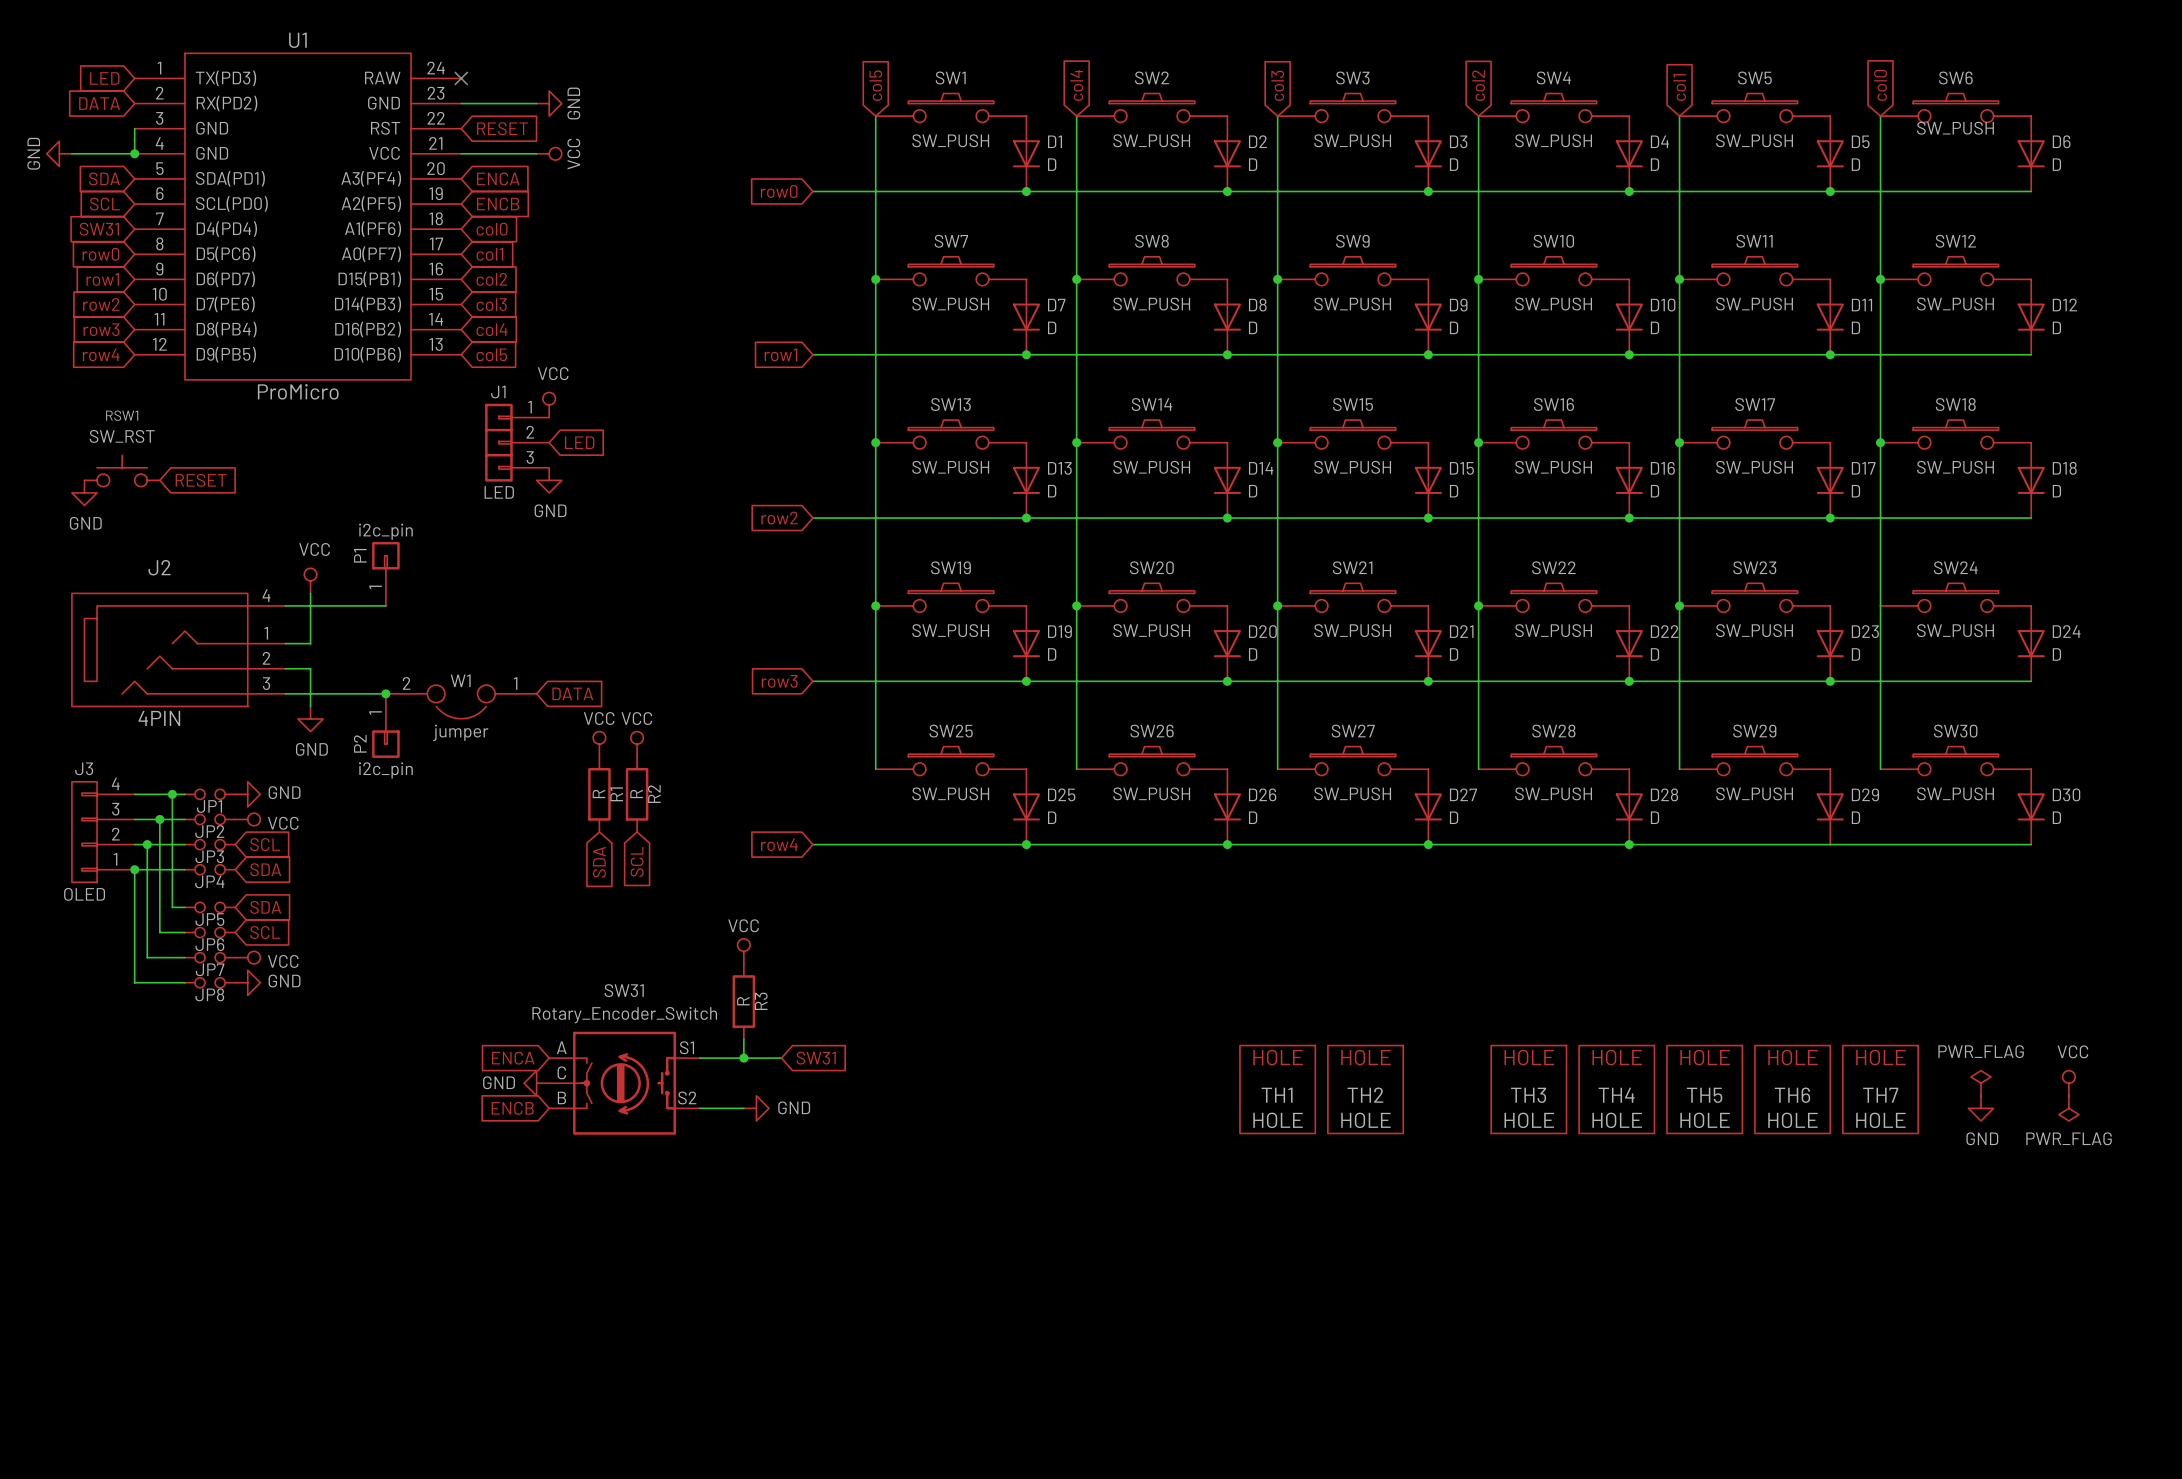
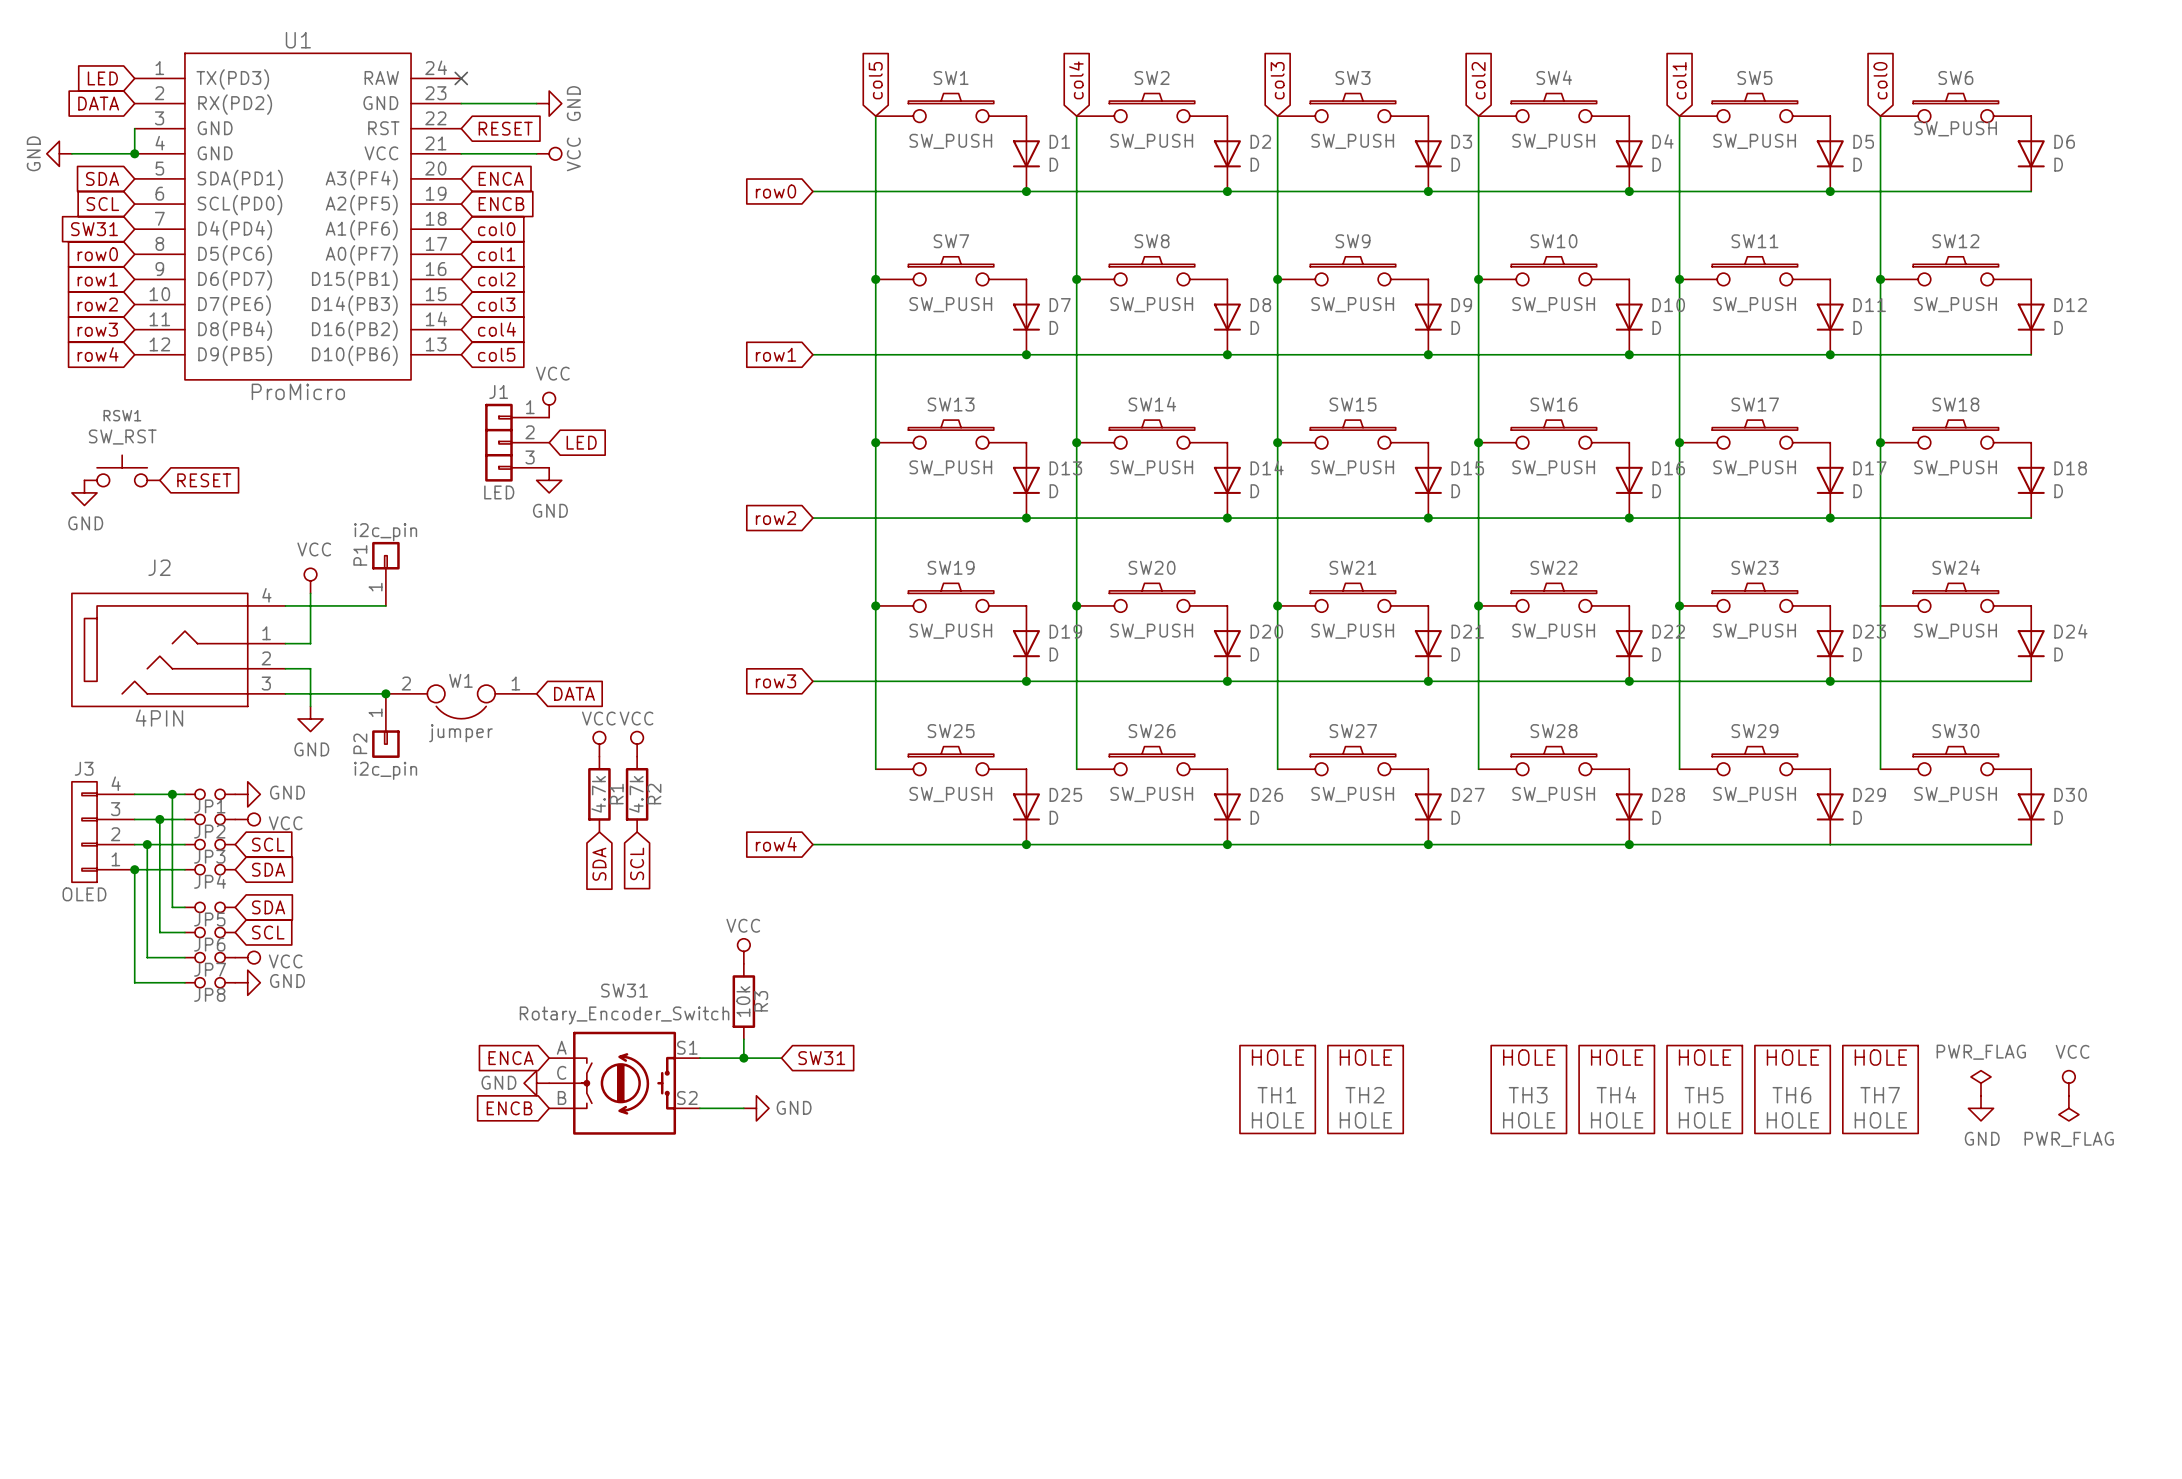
R1 value: R (598, 793) -> 4.7k (598, 794)
R2 value: R (636, 793) -> 4.7k (636, 794)
R3 value: R (743, 1001) -> 10k (743, 1001)

